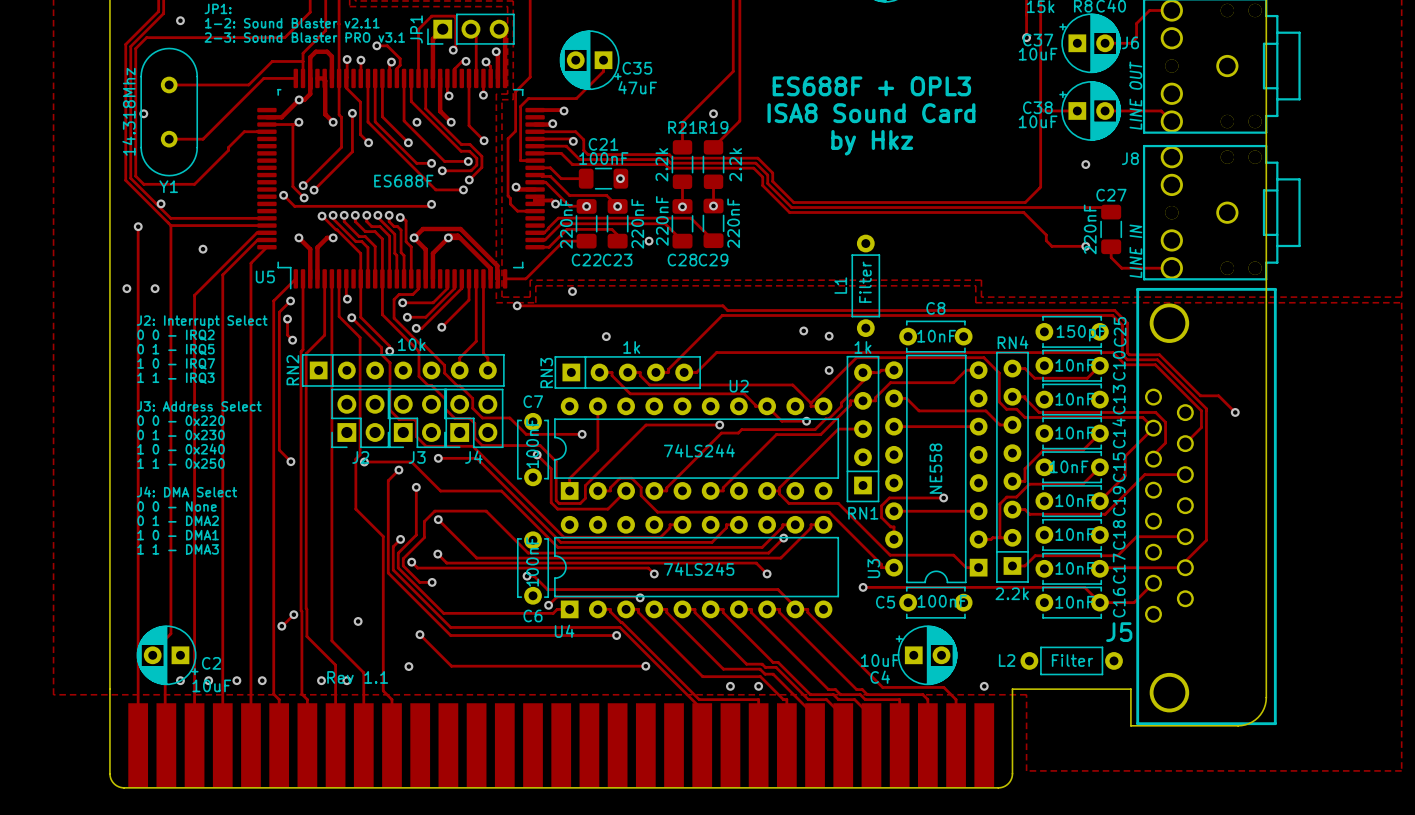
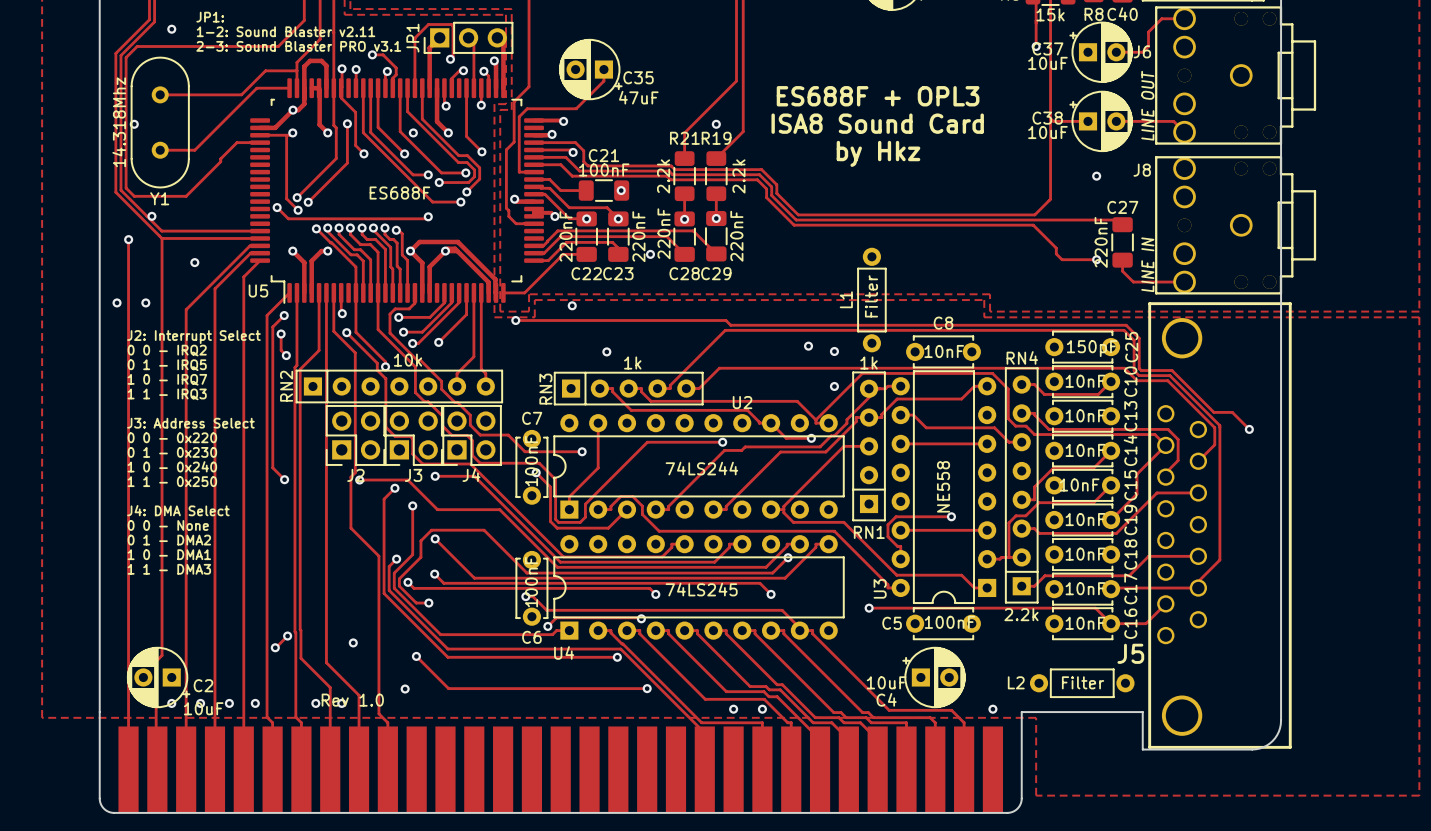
text: Rev 1.1 (357, 677) -> Rev 1.0 (352, 700)

